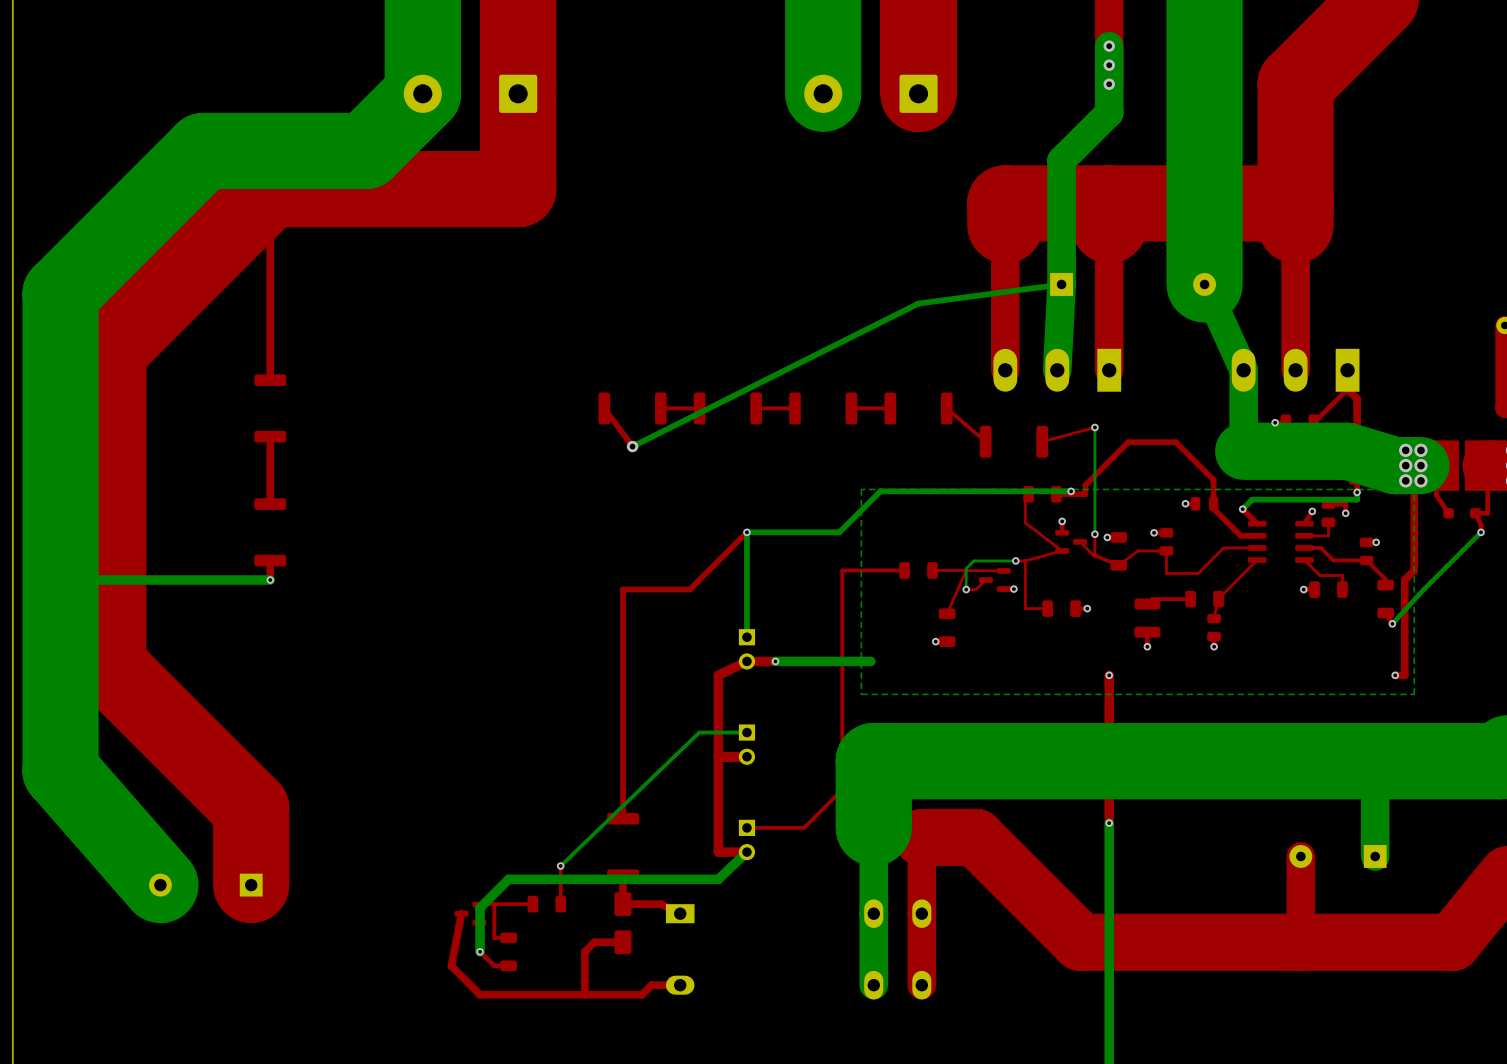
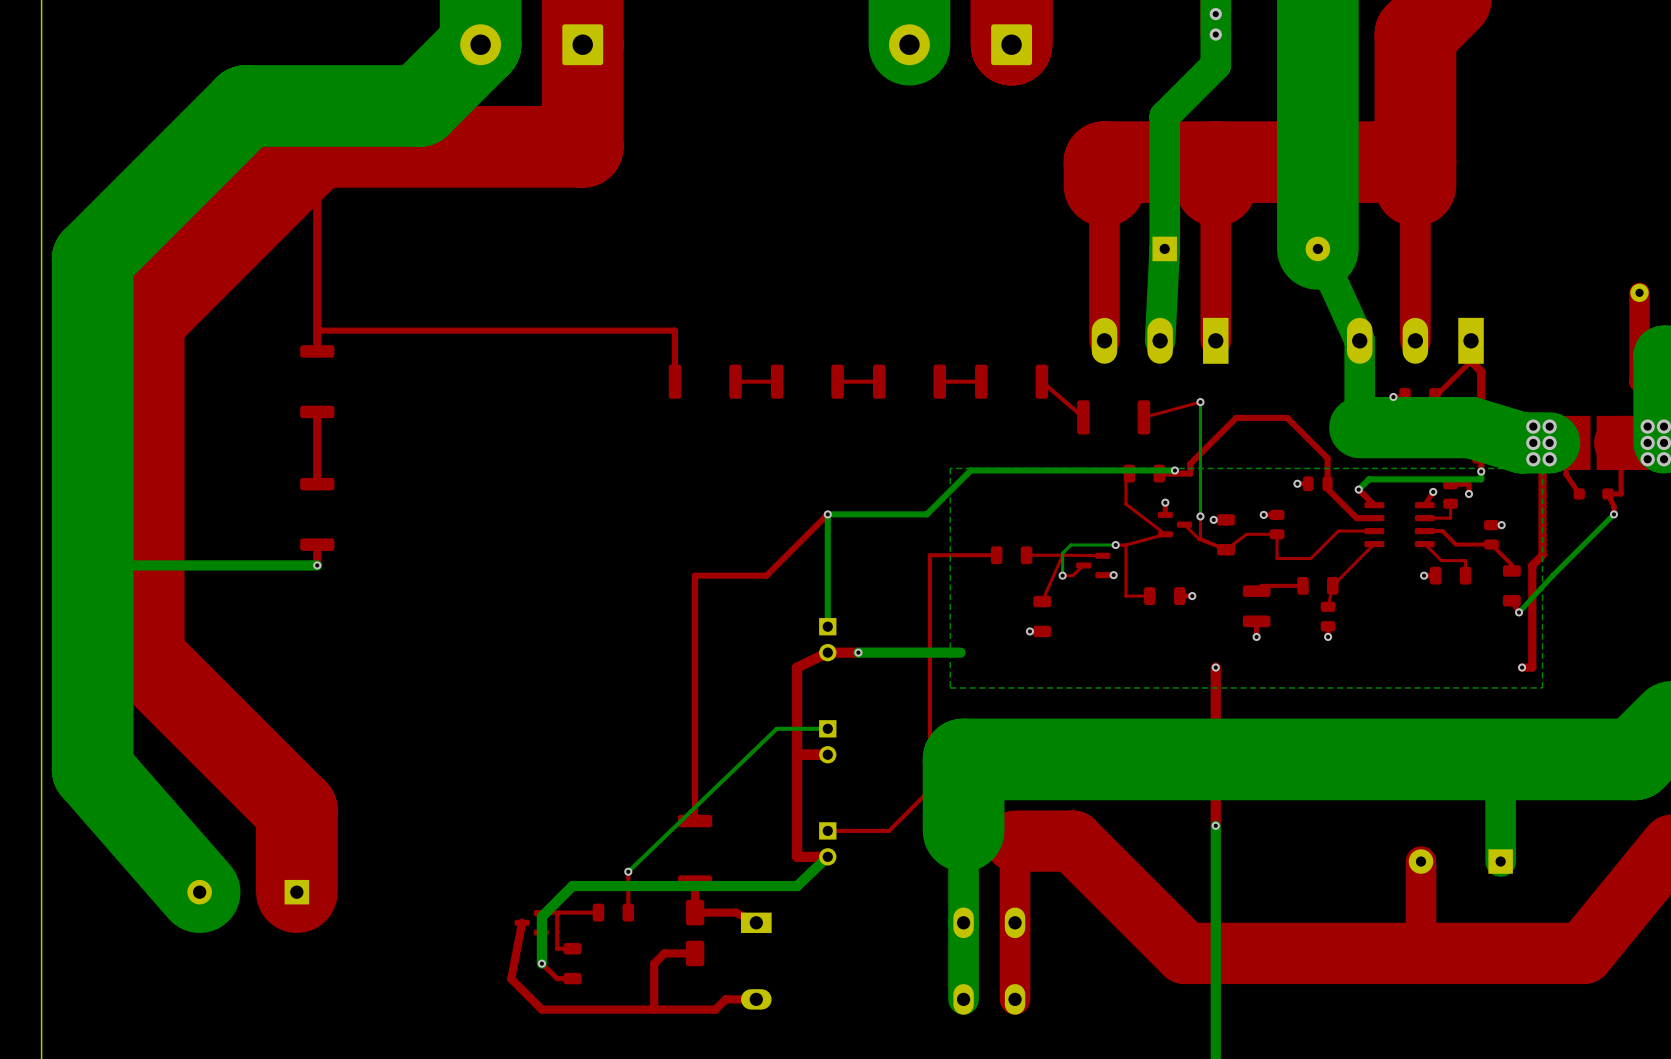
bottom track: (1061, 284) (918, 303) (632, 446) -> none
top track: (604, 408) (632, 446) -> (675, 381) (675, 330) (317, 330)
via: (632, 446) -> none

